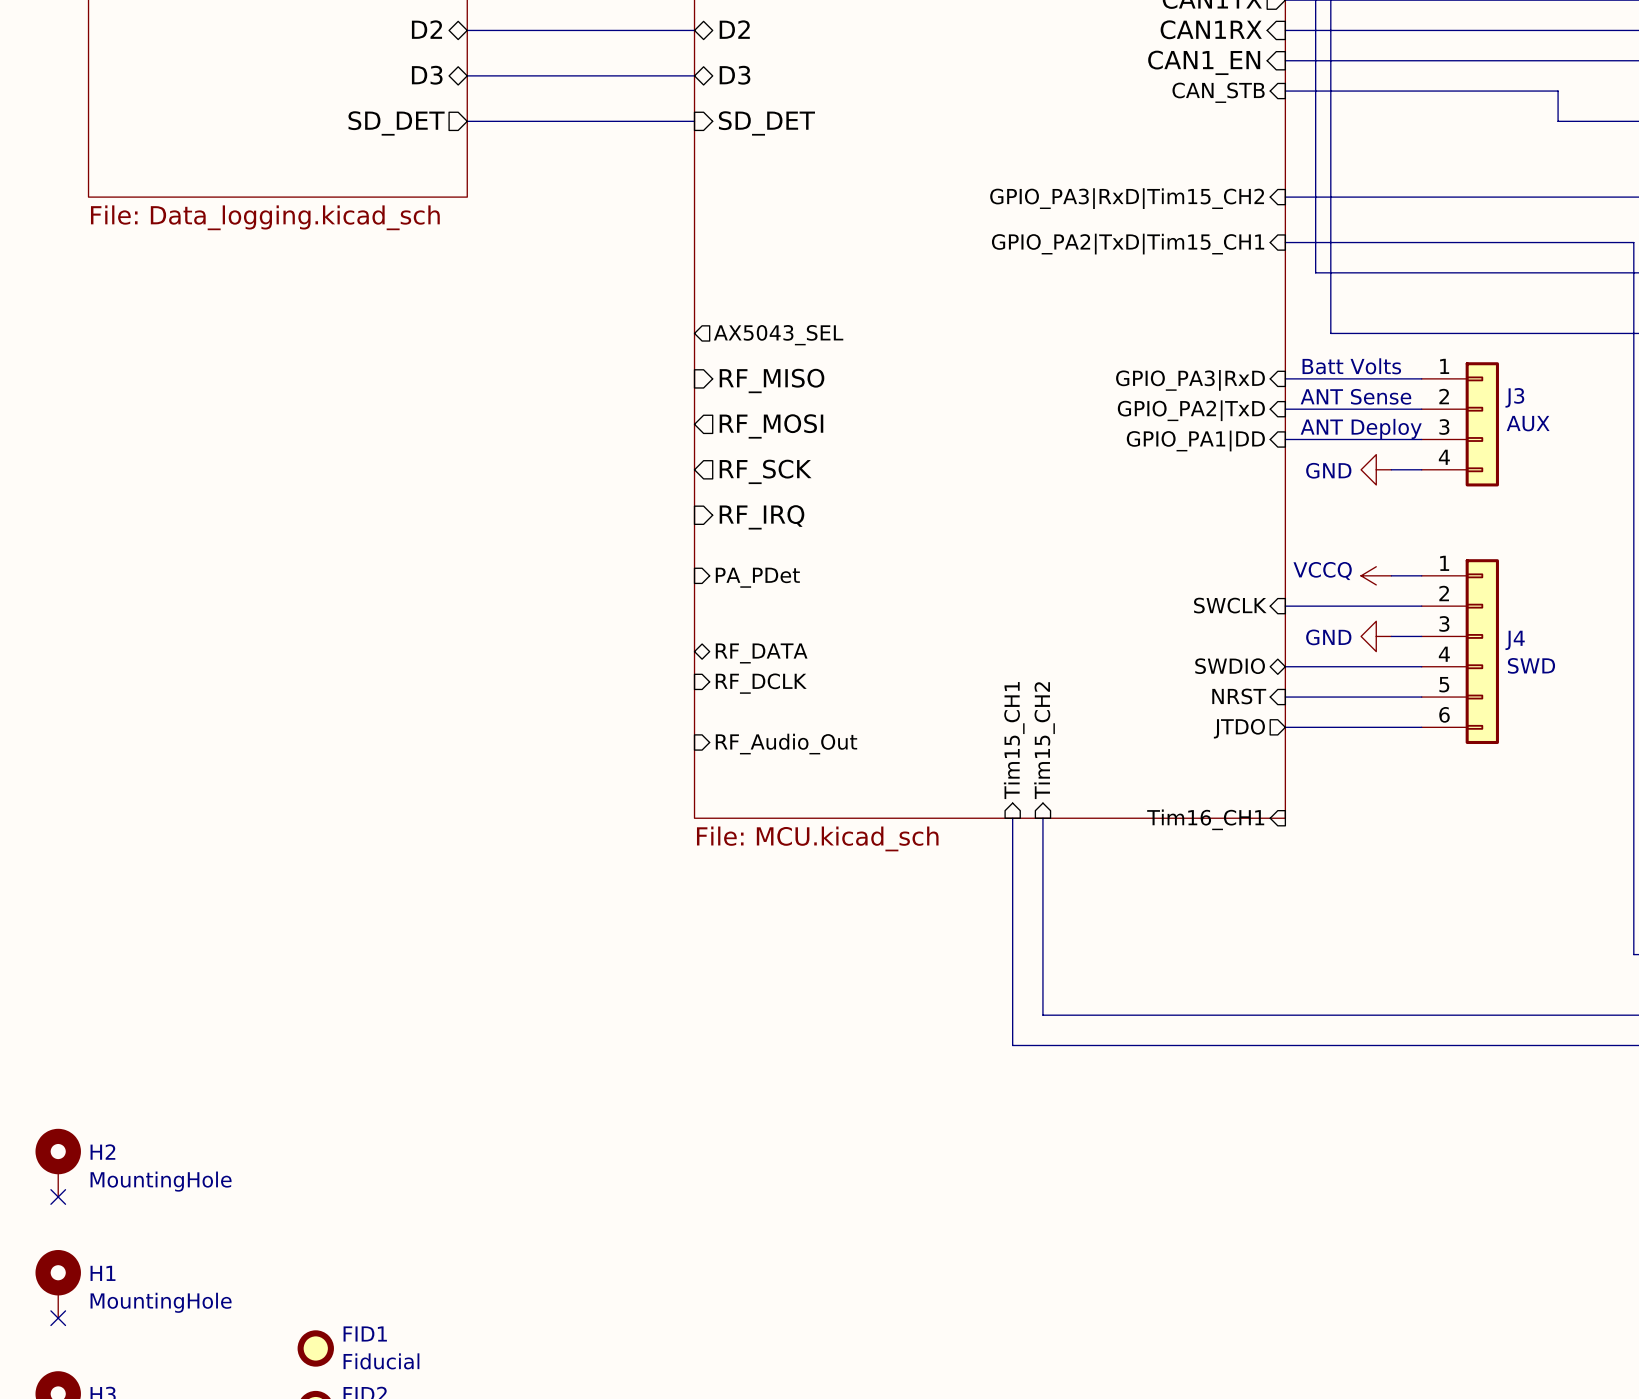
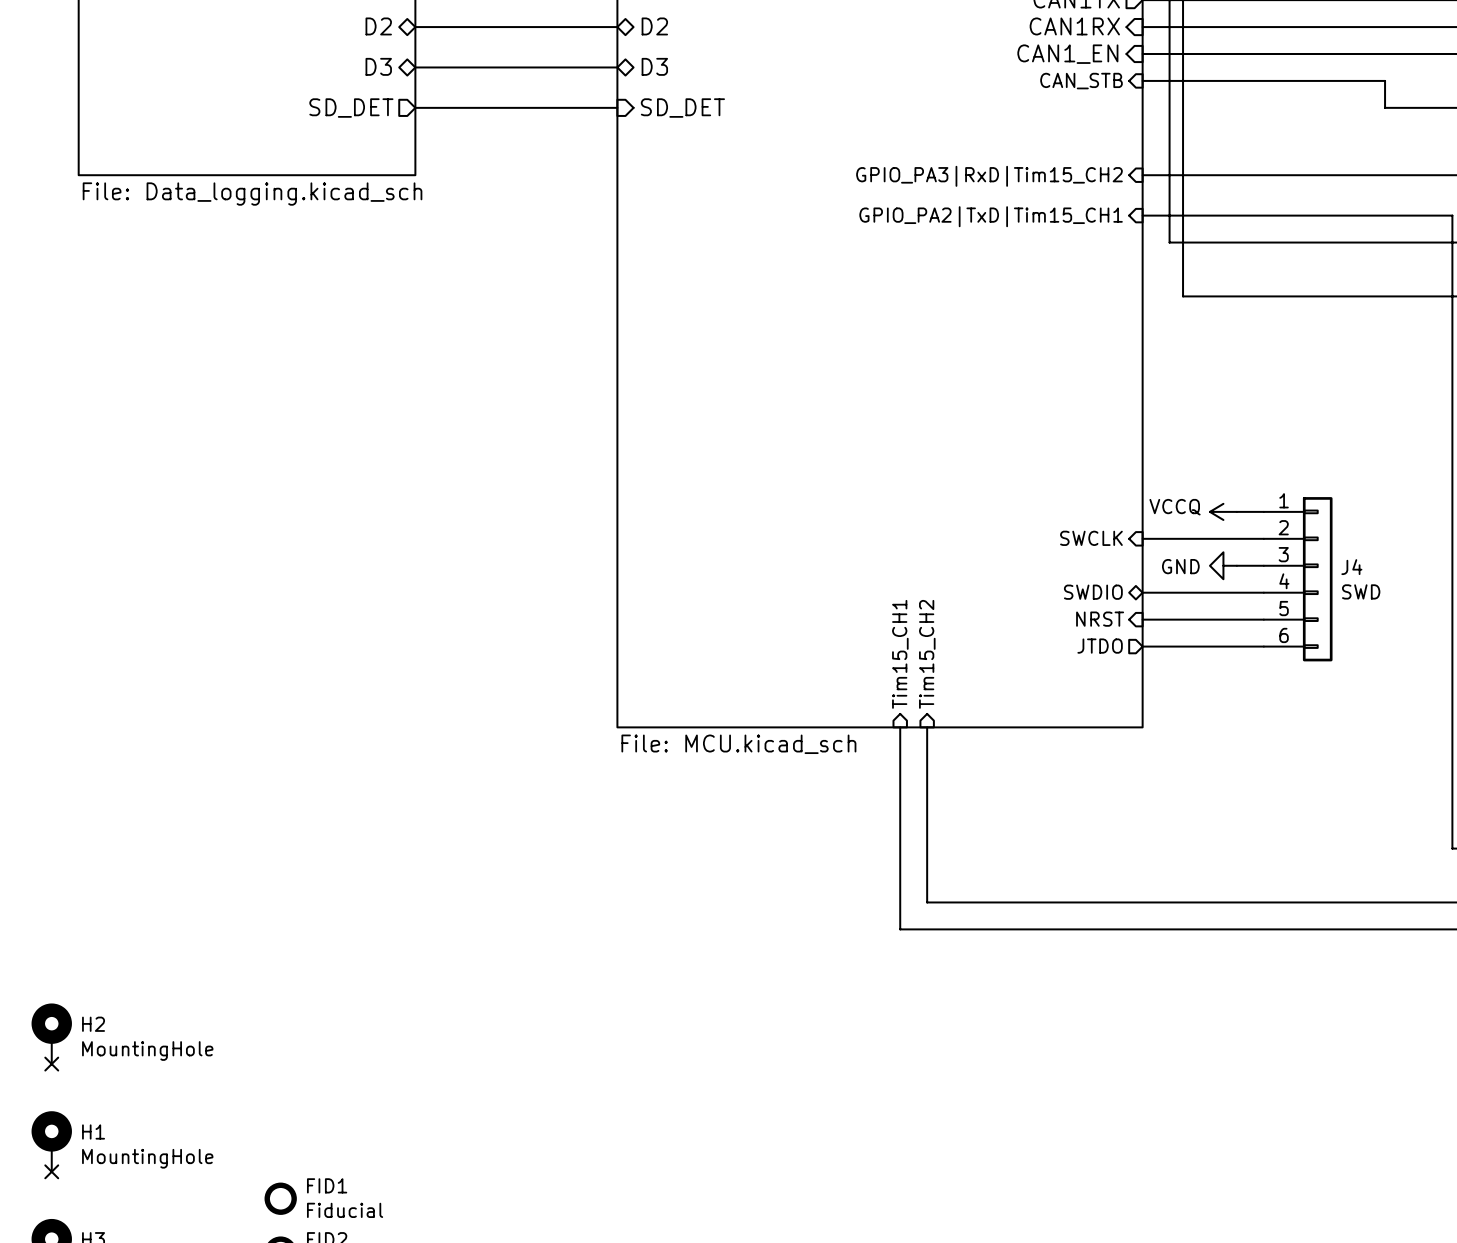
sheet pin: AX5043_SEL (778, 335) -> none
text: Batt Volts (1351, 366) -> none
wire: (1285, 378) (1421, 378) -> none
sheet pin: RF_MISO (771, 380) -> none
sheet pin: GPIO_PA3|RxD (1190, 380) -> none
text: ANT Sense (1355, 396) -> none
wire: (1285, 409) (1421, 409) -> none
sheet pin: GPIO_PA2|TxD (1191, 410) -> none
J3: AUX (1460, 424) -> none
sheet pin: RF_MOSI (771, 426) -> none
text: ANT Deploy (1361, 428) -> none
wire: (1285, 439) (1421, 439) -> none
sheet pin: GPIO_PA1|DD (1195, 441) -> none
power symbol: GND (1376, 469) -> none
wire: (1391, 469) (1421, 469) -> none
sheet pin: RF_SCK (765, 471) -> none
sheet pin: RF_IRQ (761, 517) -> none
sheet pin: PA_PDet (757, 577) -> none
sheet pin: RF_DATA (761, 653) -> none
sheet pin: RF_DCLK (761, 683) -> none
sheet pin: RF_Audio_Out (786, 744) -> none
sheet pin: Tim16_CH1 (1205, 819) -> none

